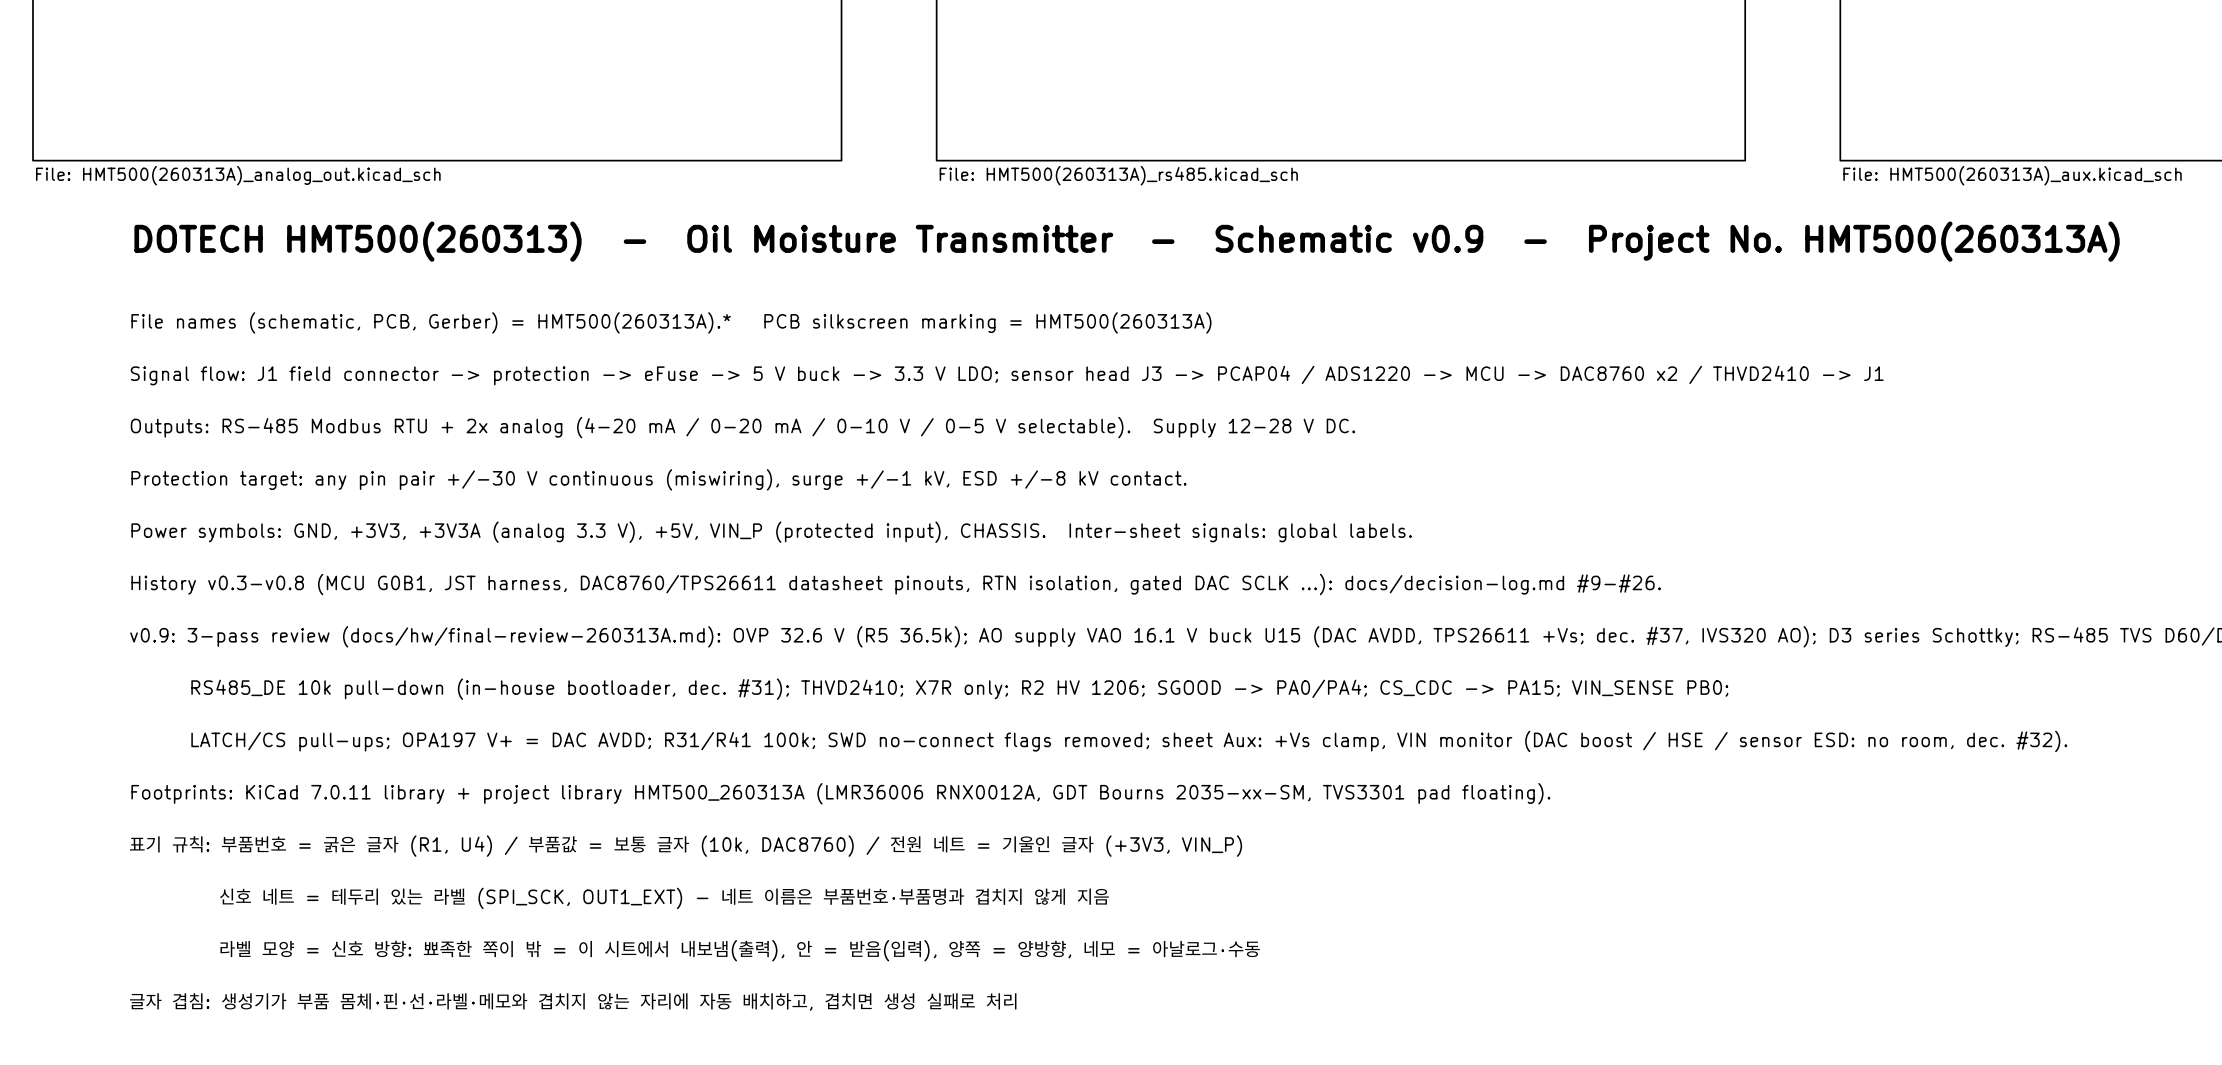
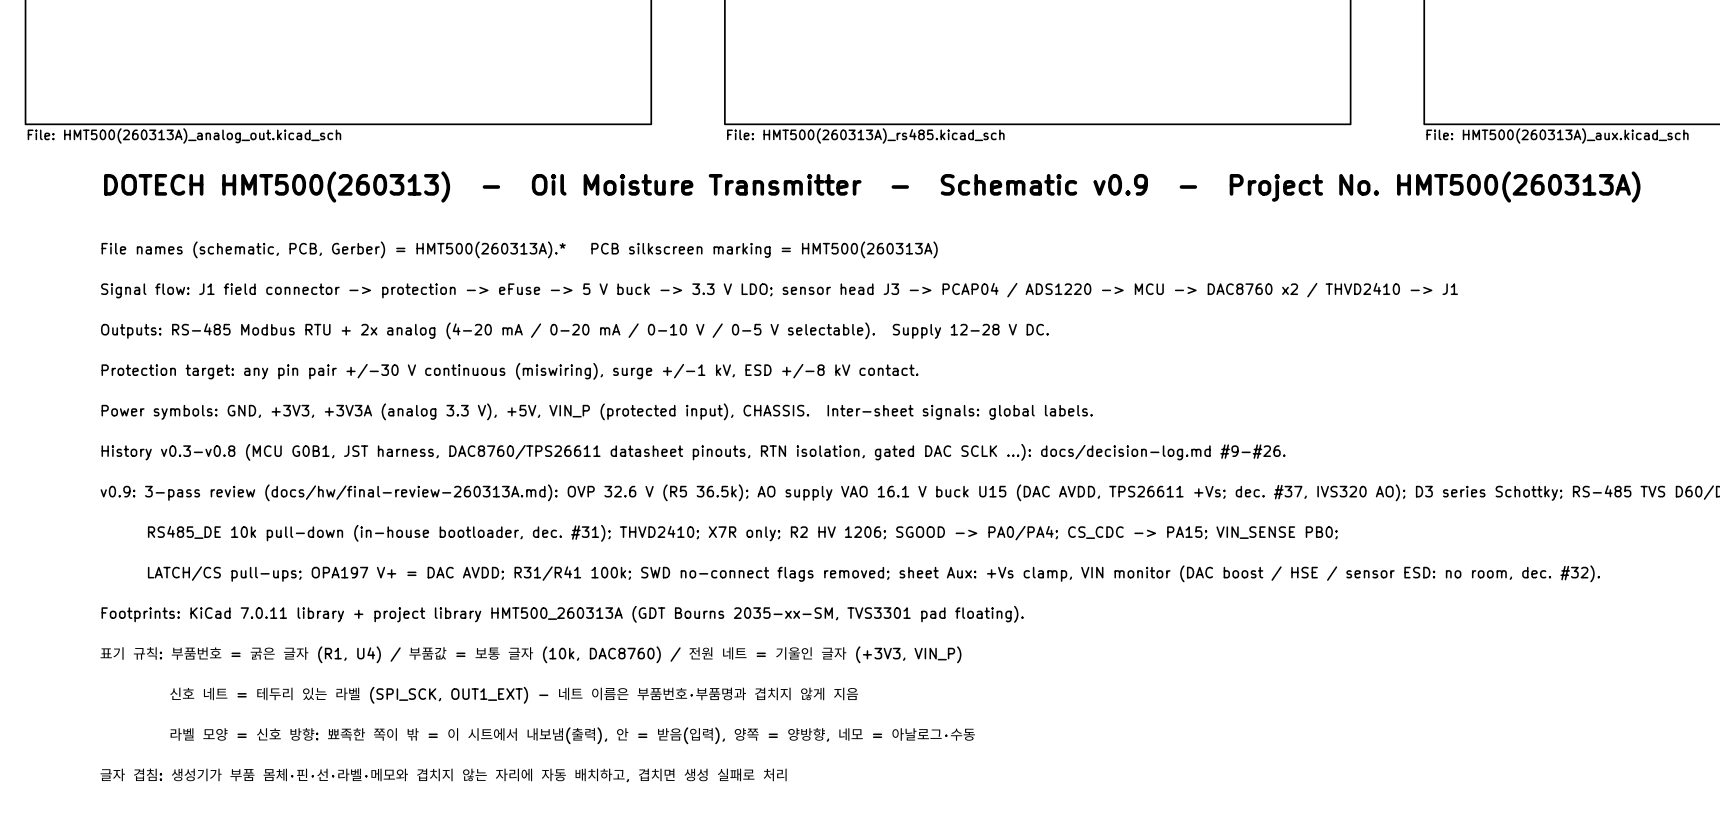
text: Footprints: KiCad 7.0.11 library + project library HMT500_260313A (LMR36006 RNX0012A, GDT Bourns 2035-xx-SM, TVS3301 pad floating). (840, 793) -> Footprints: KiCad 7.0.11 library + project library HMT500_260313A (GDT Bourns 2035-xx-SM, TVS3301 pad floating). (562, 614)

